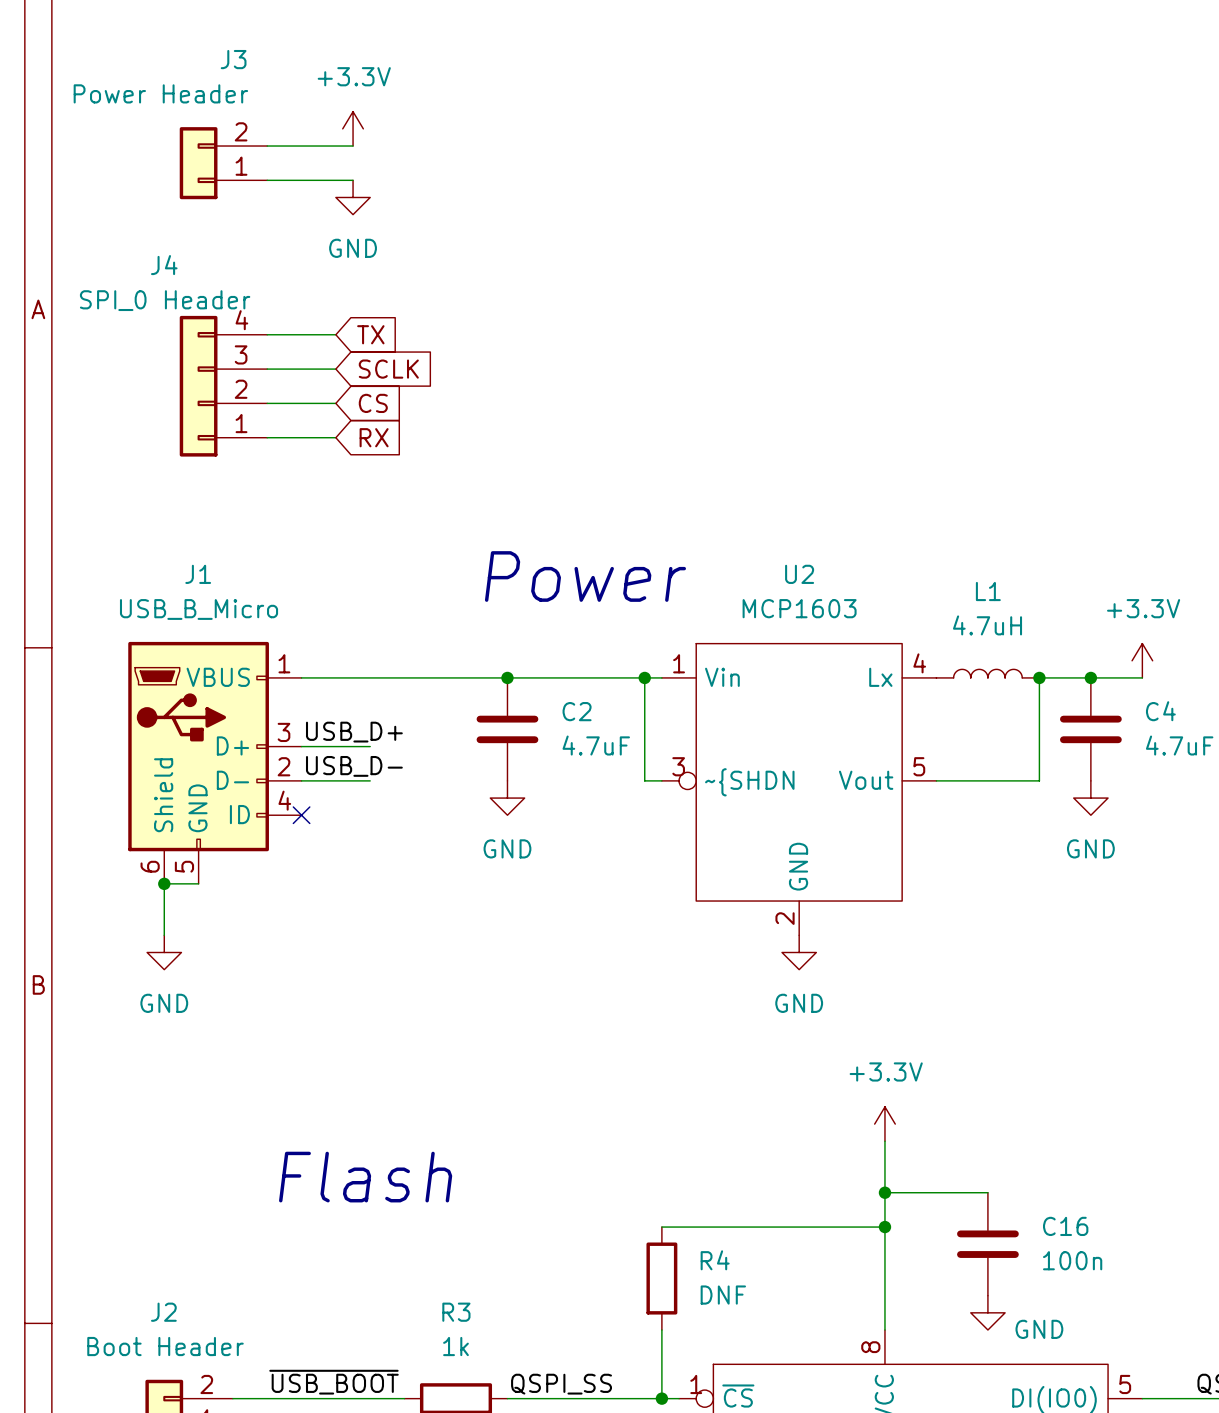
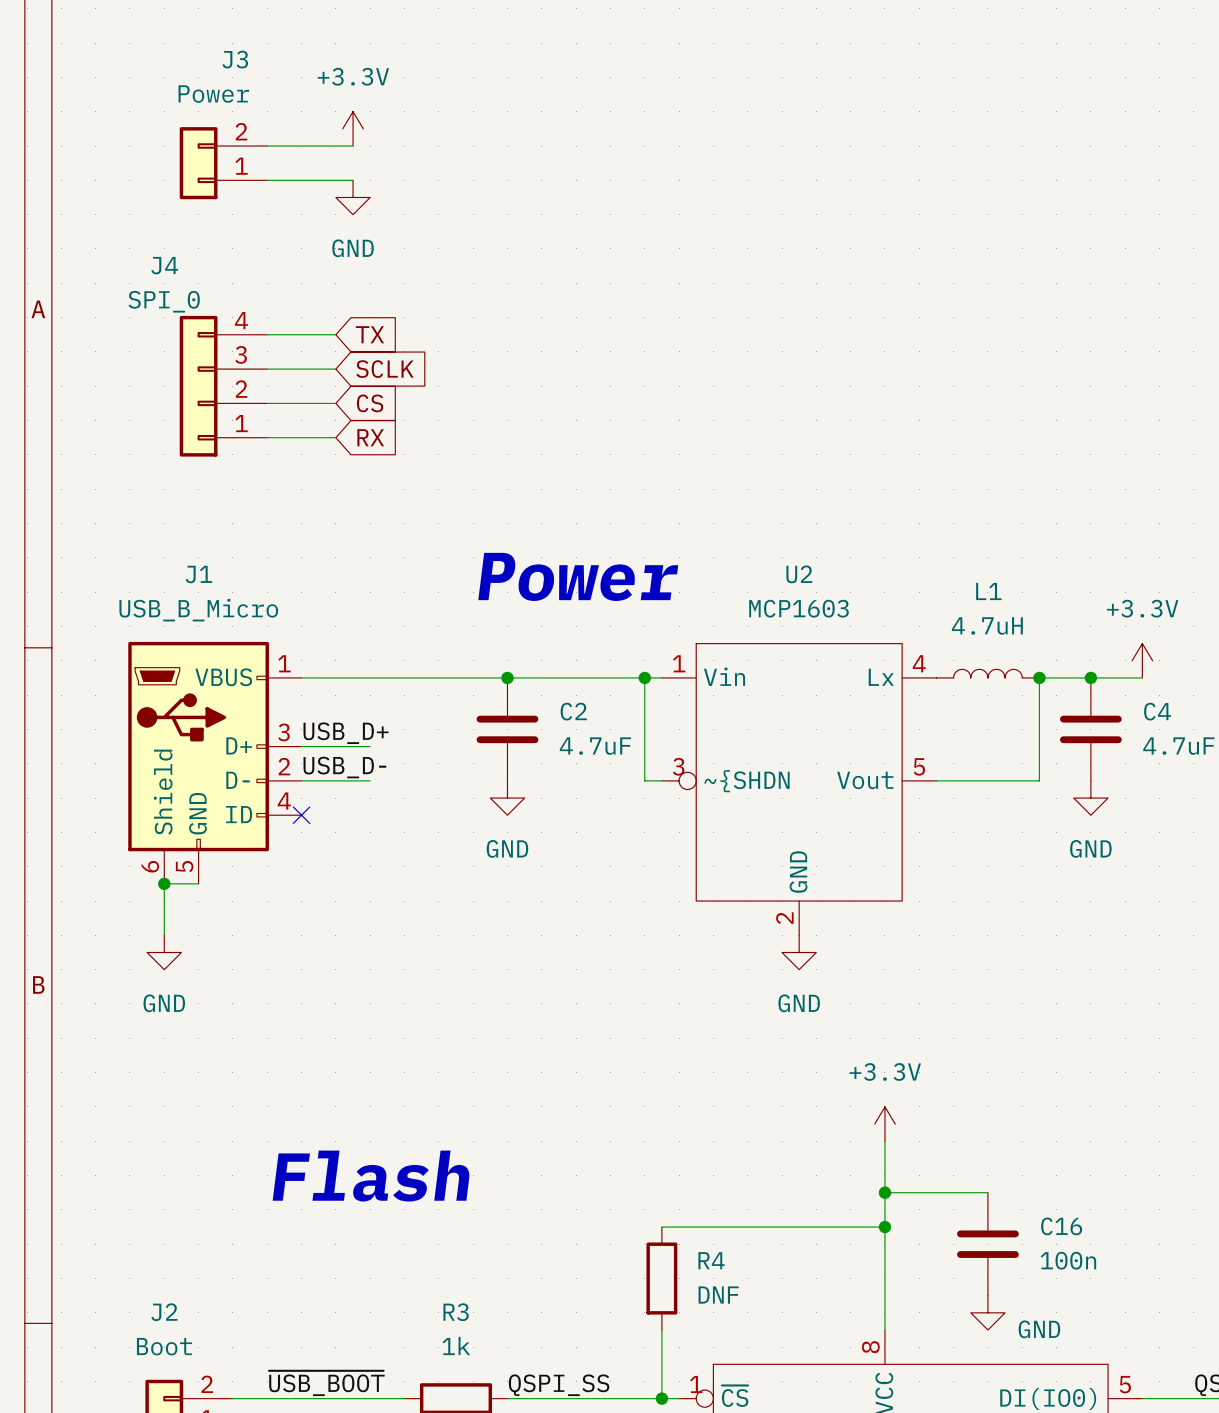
J3 value: Power Header (160, 93) -> Power (213, 94)
J4 value: SPI_0 Header (165, 300) -> SPI_0 (164, 301)
J2 value: Boot Header (165, 1346) -> Boot (164, 1346)

